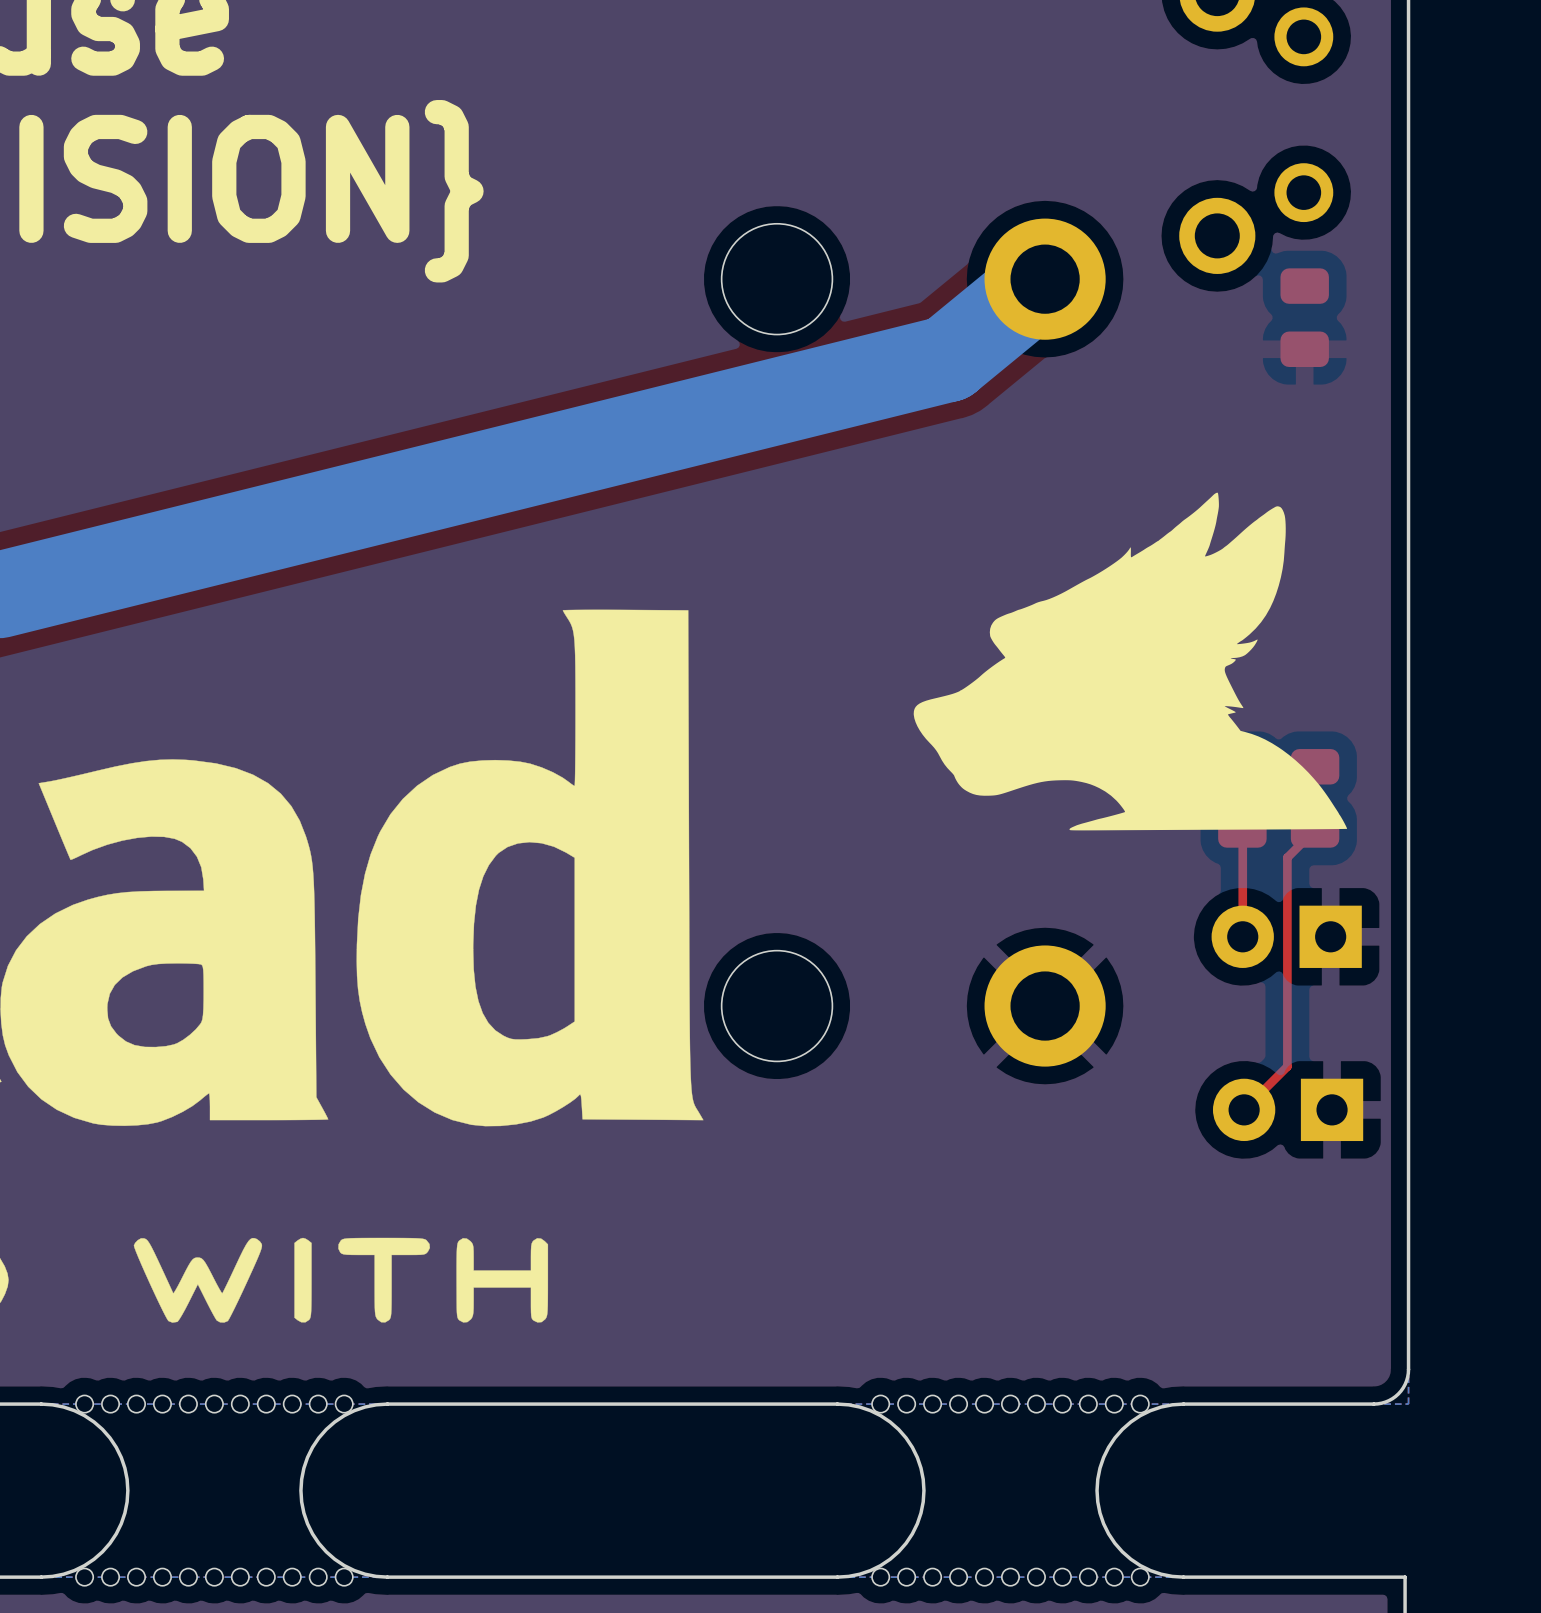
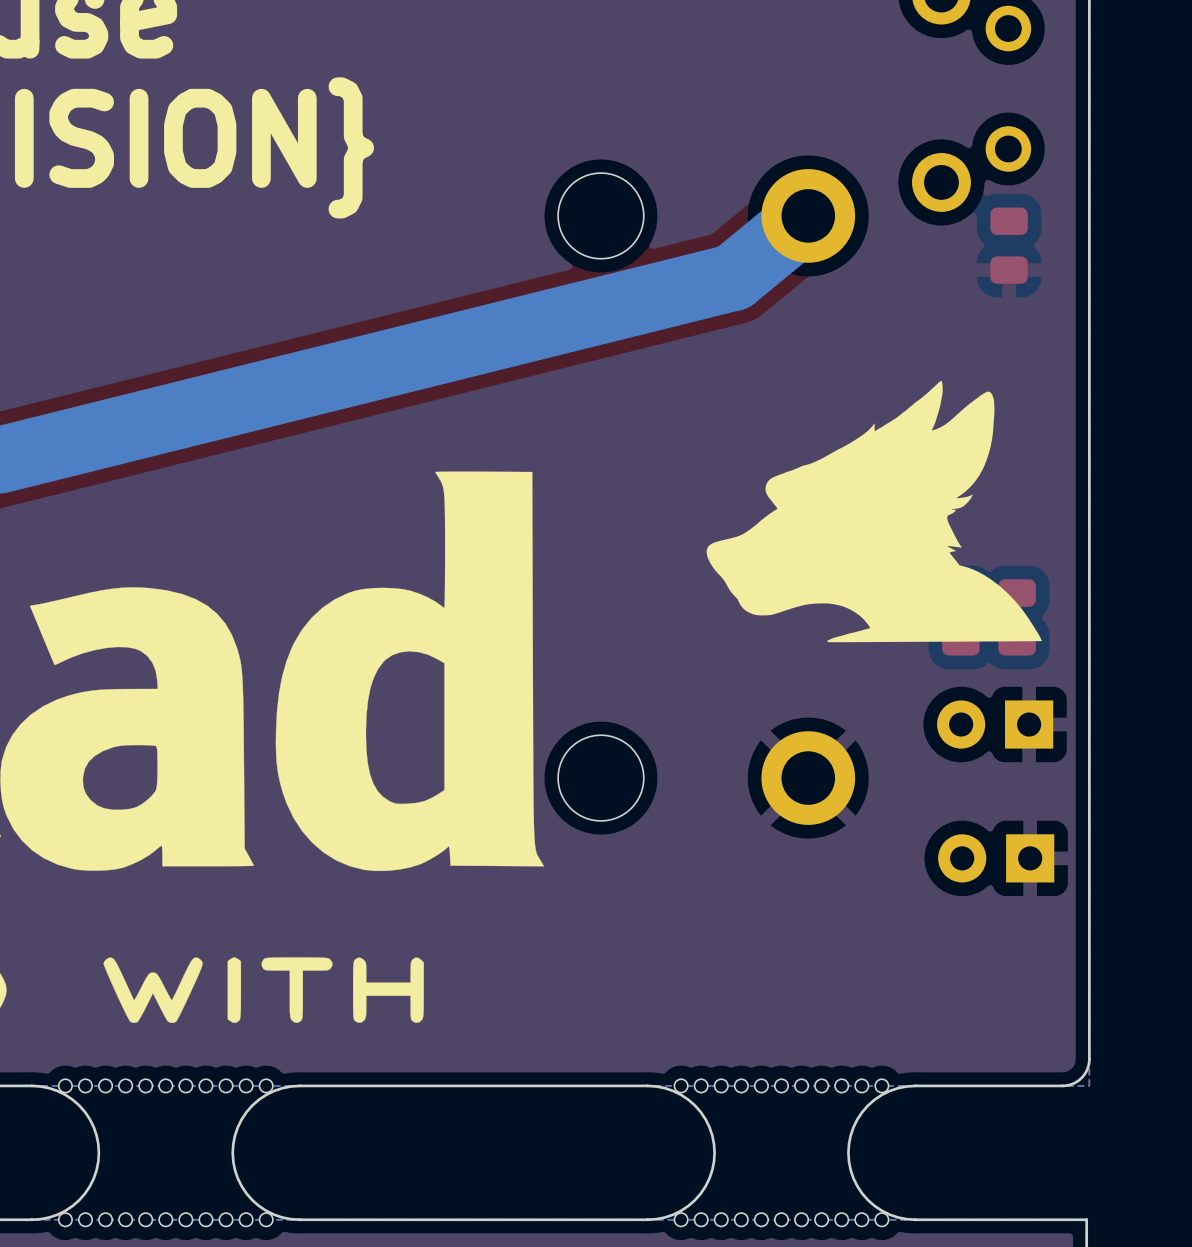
top track: (1315, 829) (1287, 857) (1287, 1066) (1244, 1109) -> none
top track: (1242, 830) (1242, 936) -> none

